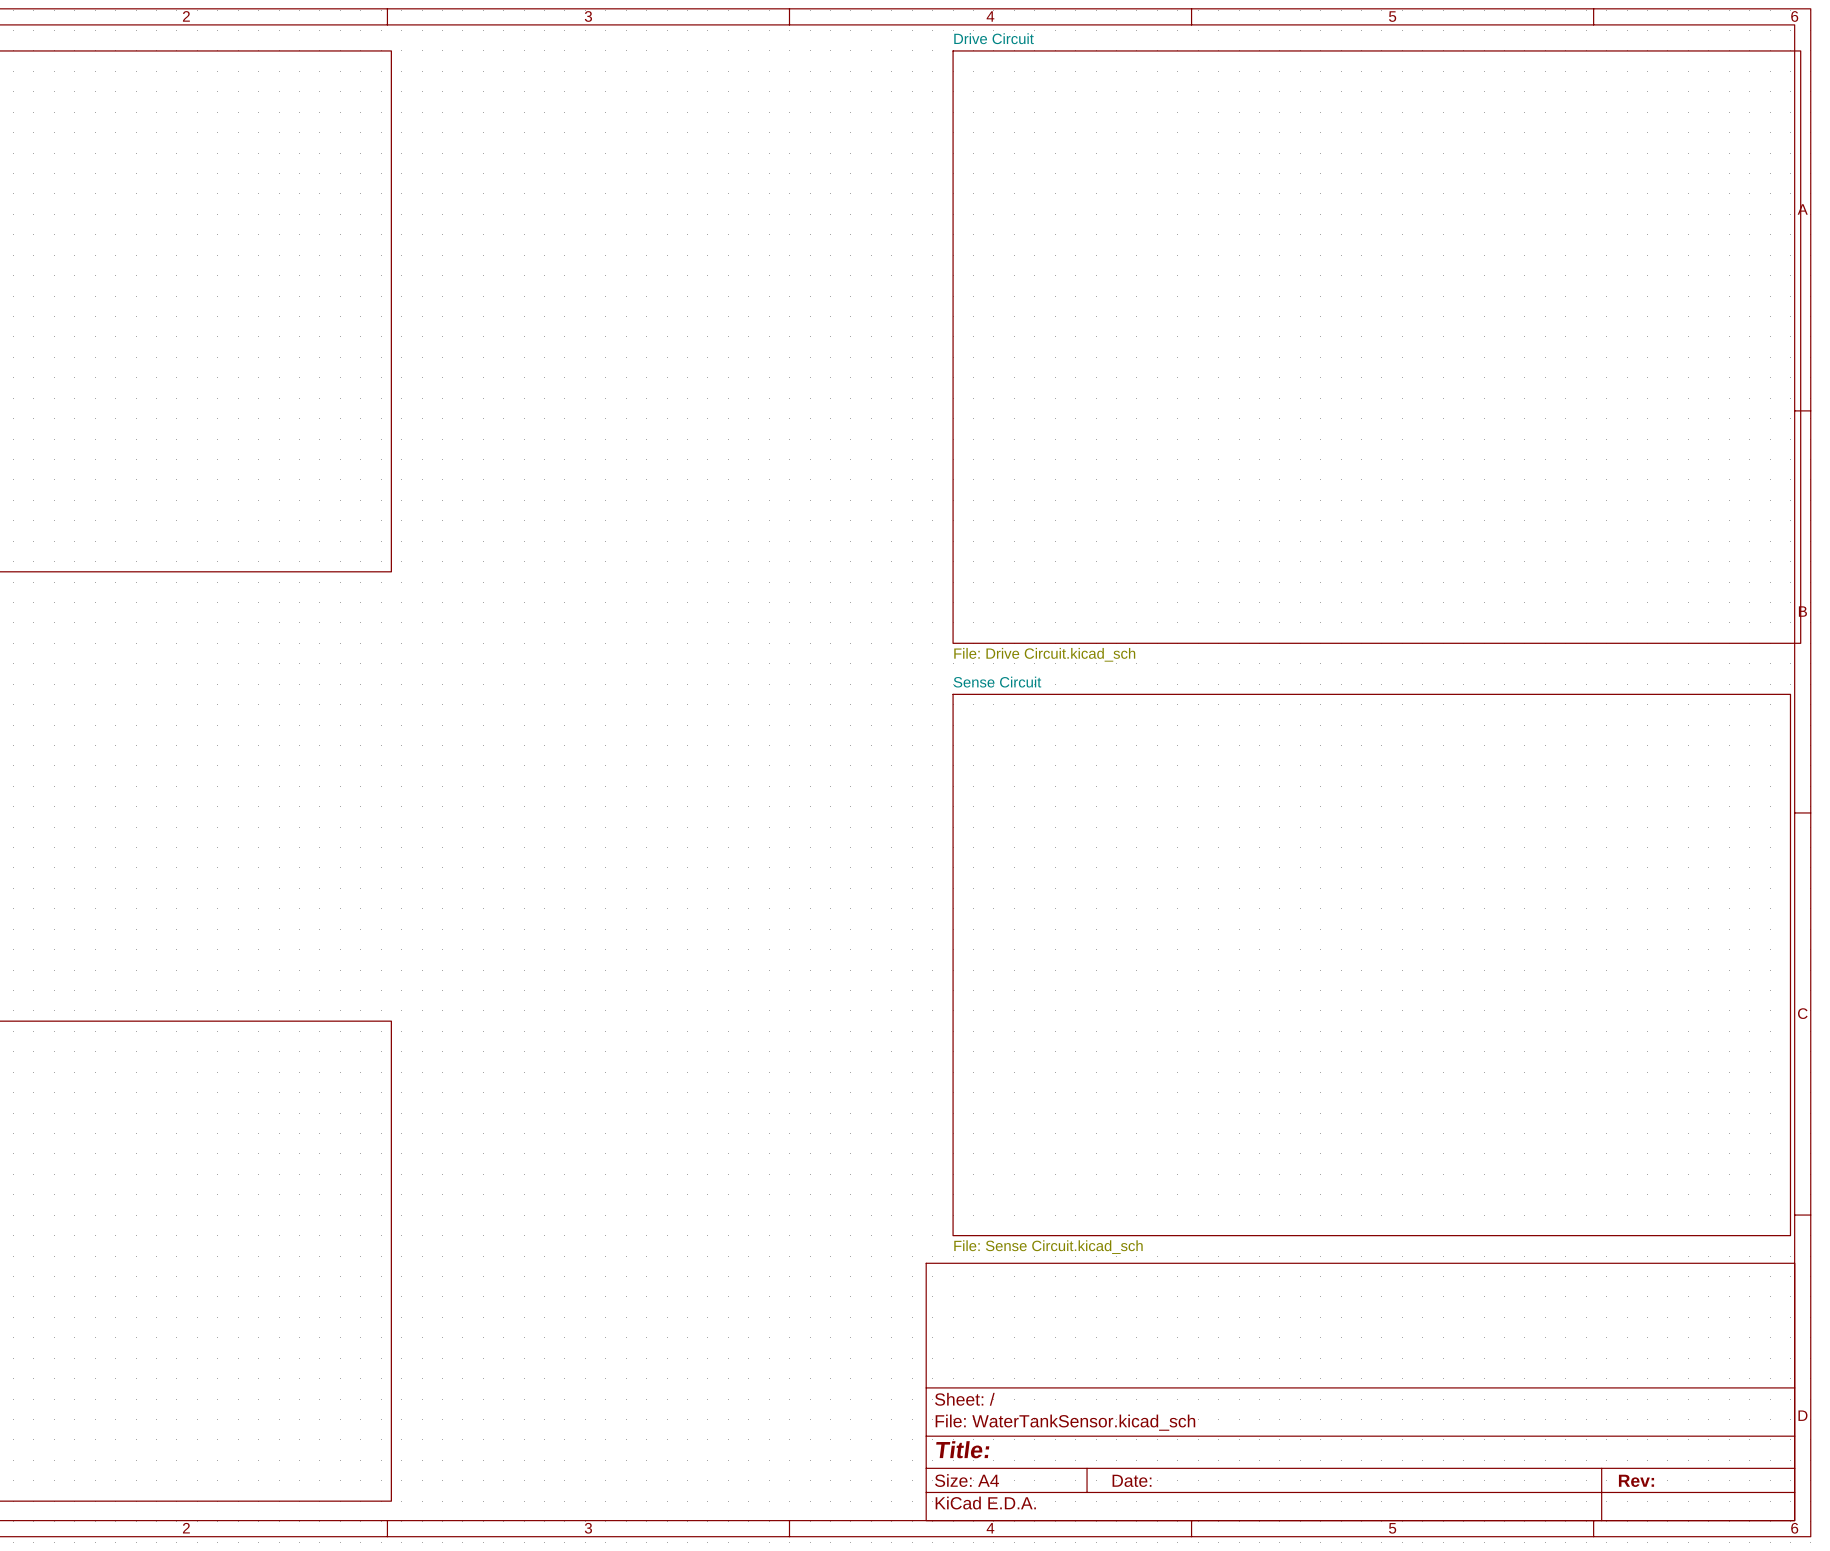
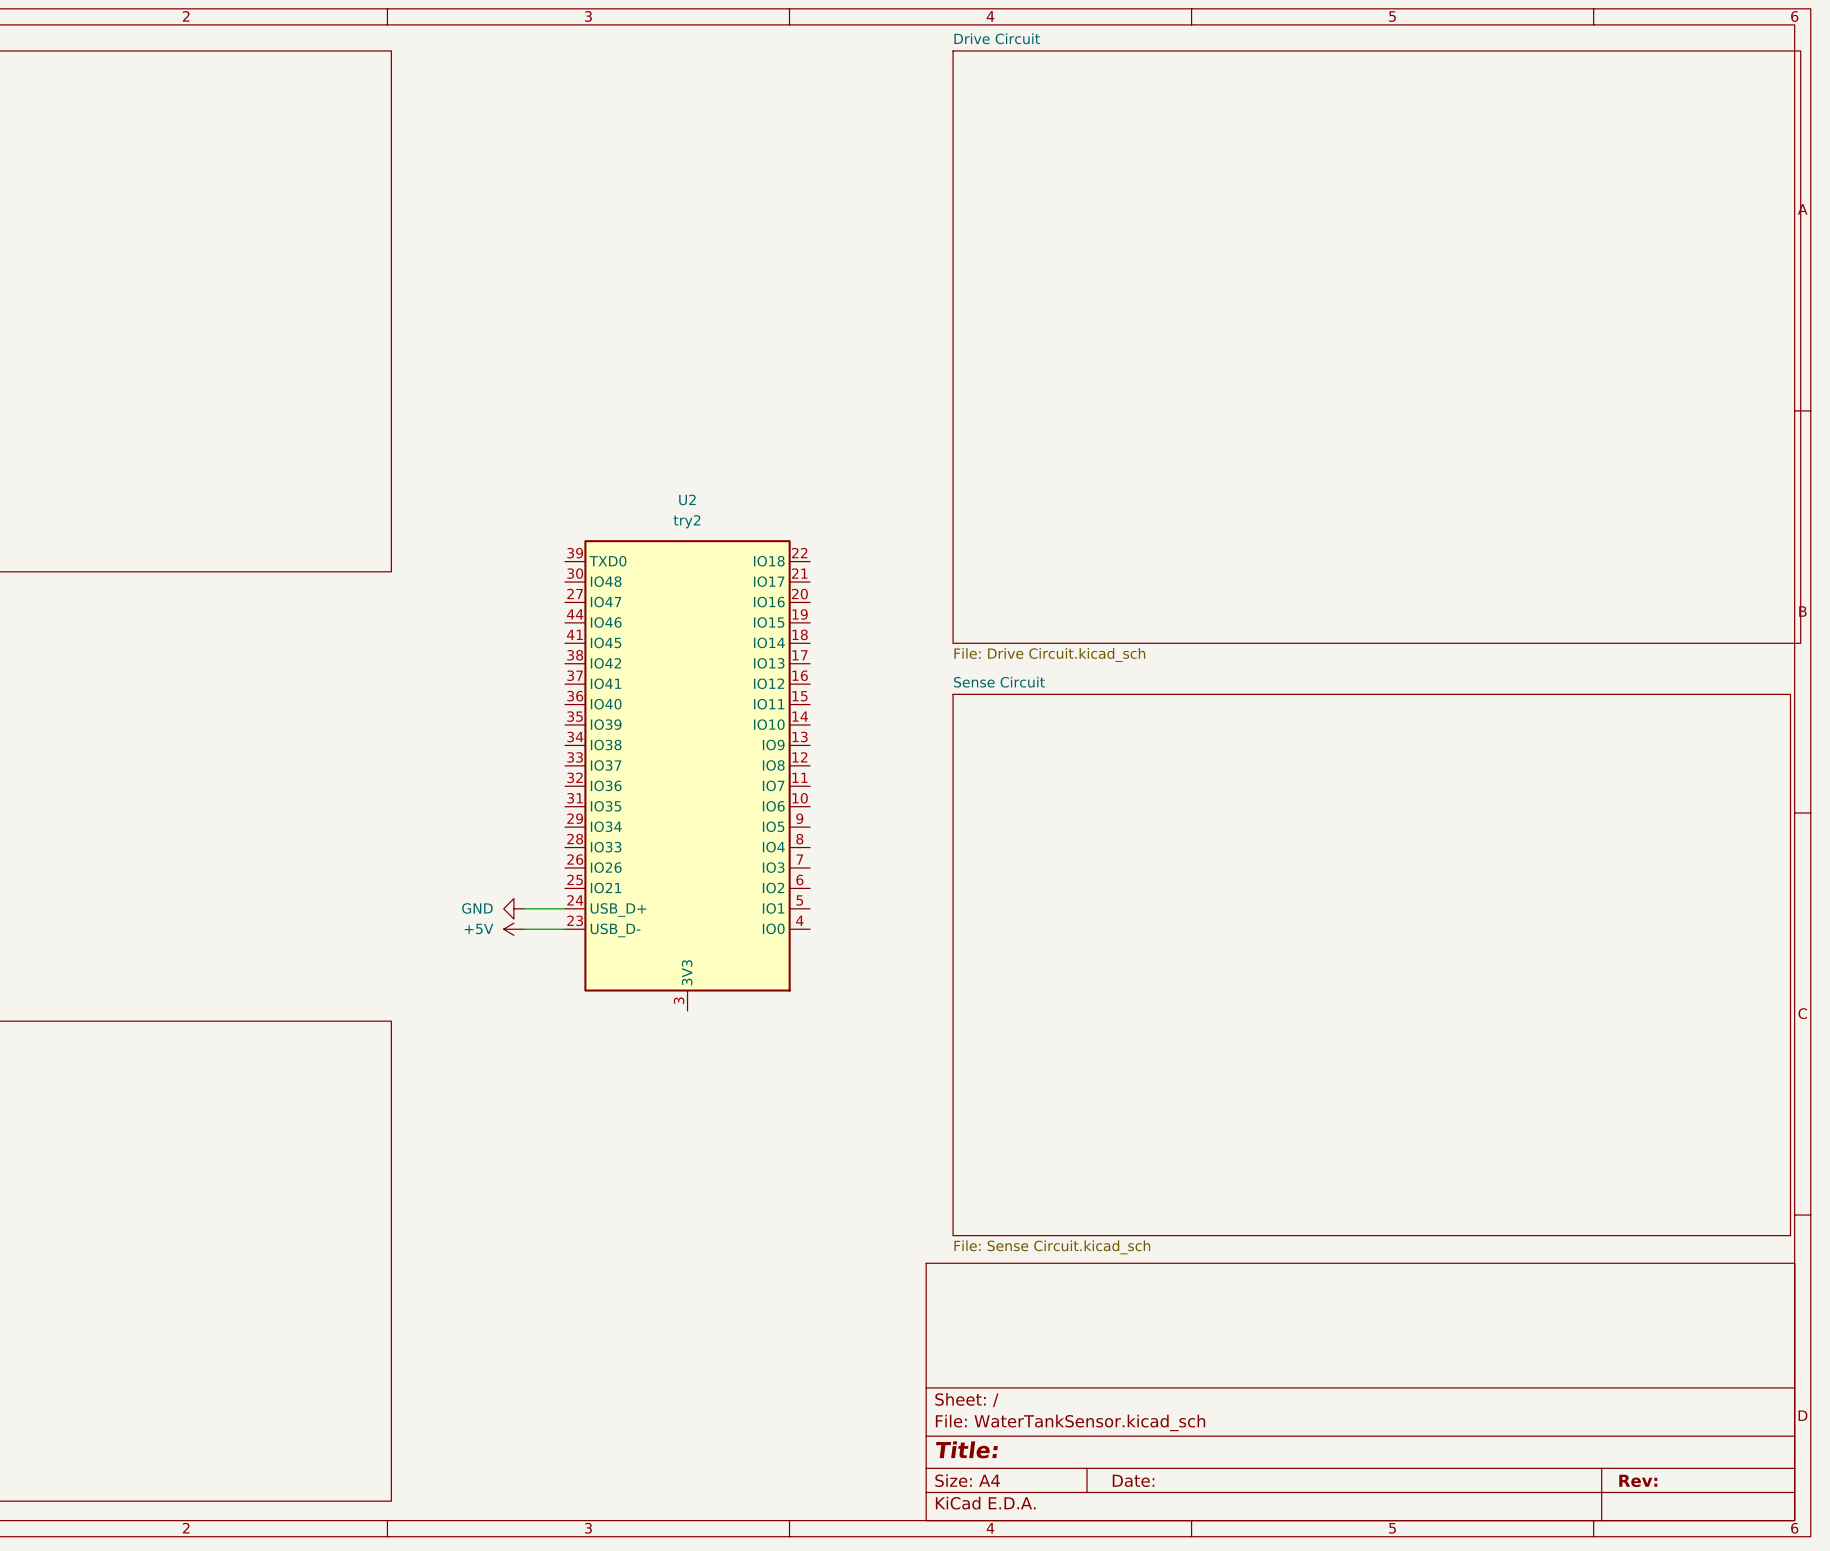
U2: none -> try2 (687, 775)
power symbol: none -> GND (513, 908)
wire: none -> (524, 908) (564, 908)
power symbol: none -> +5V (513, 929)
wire: none -> (524, 929) (564, 929)

